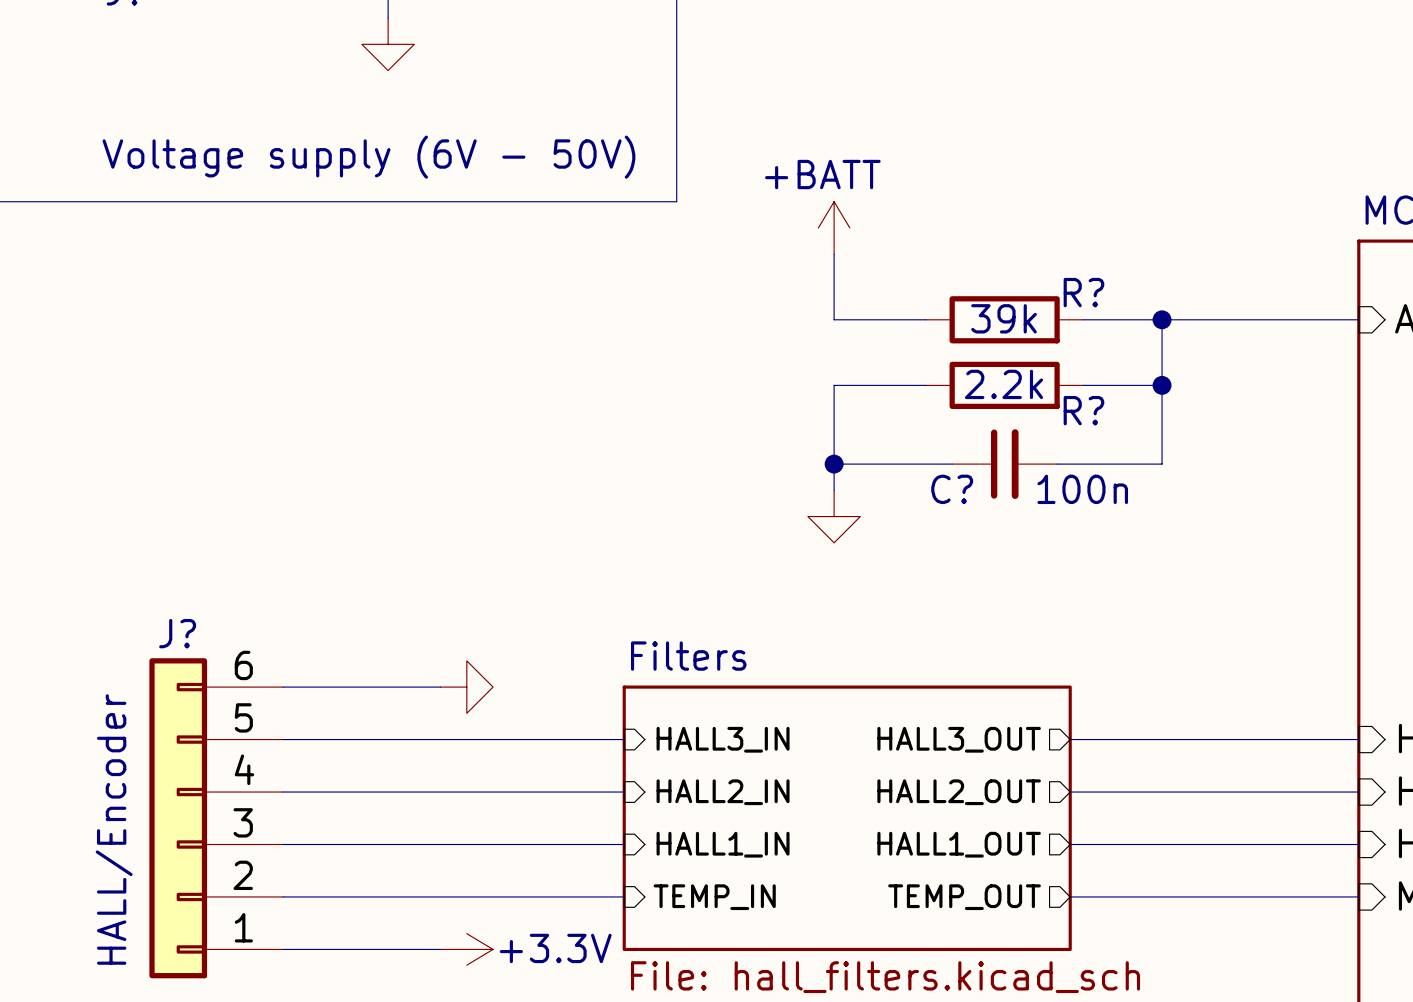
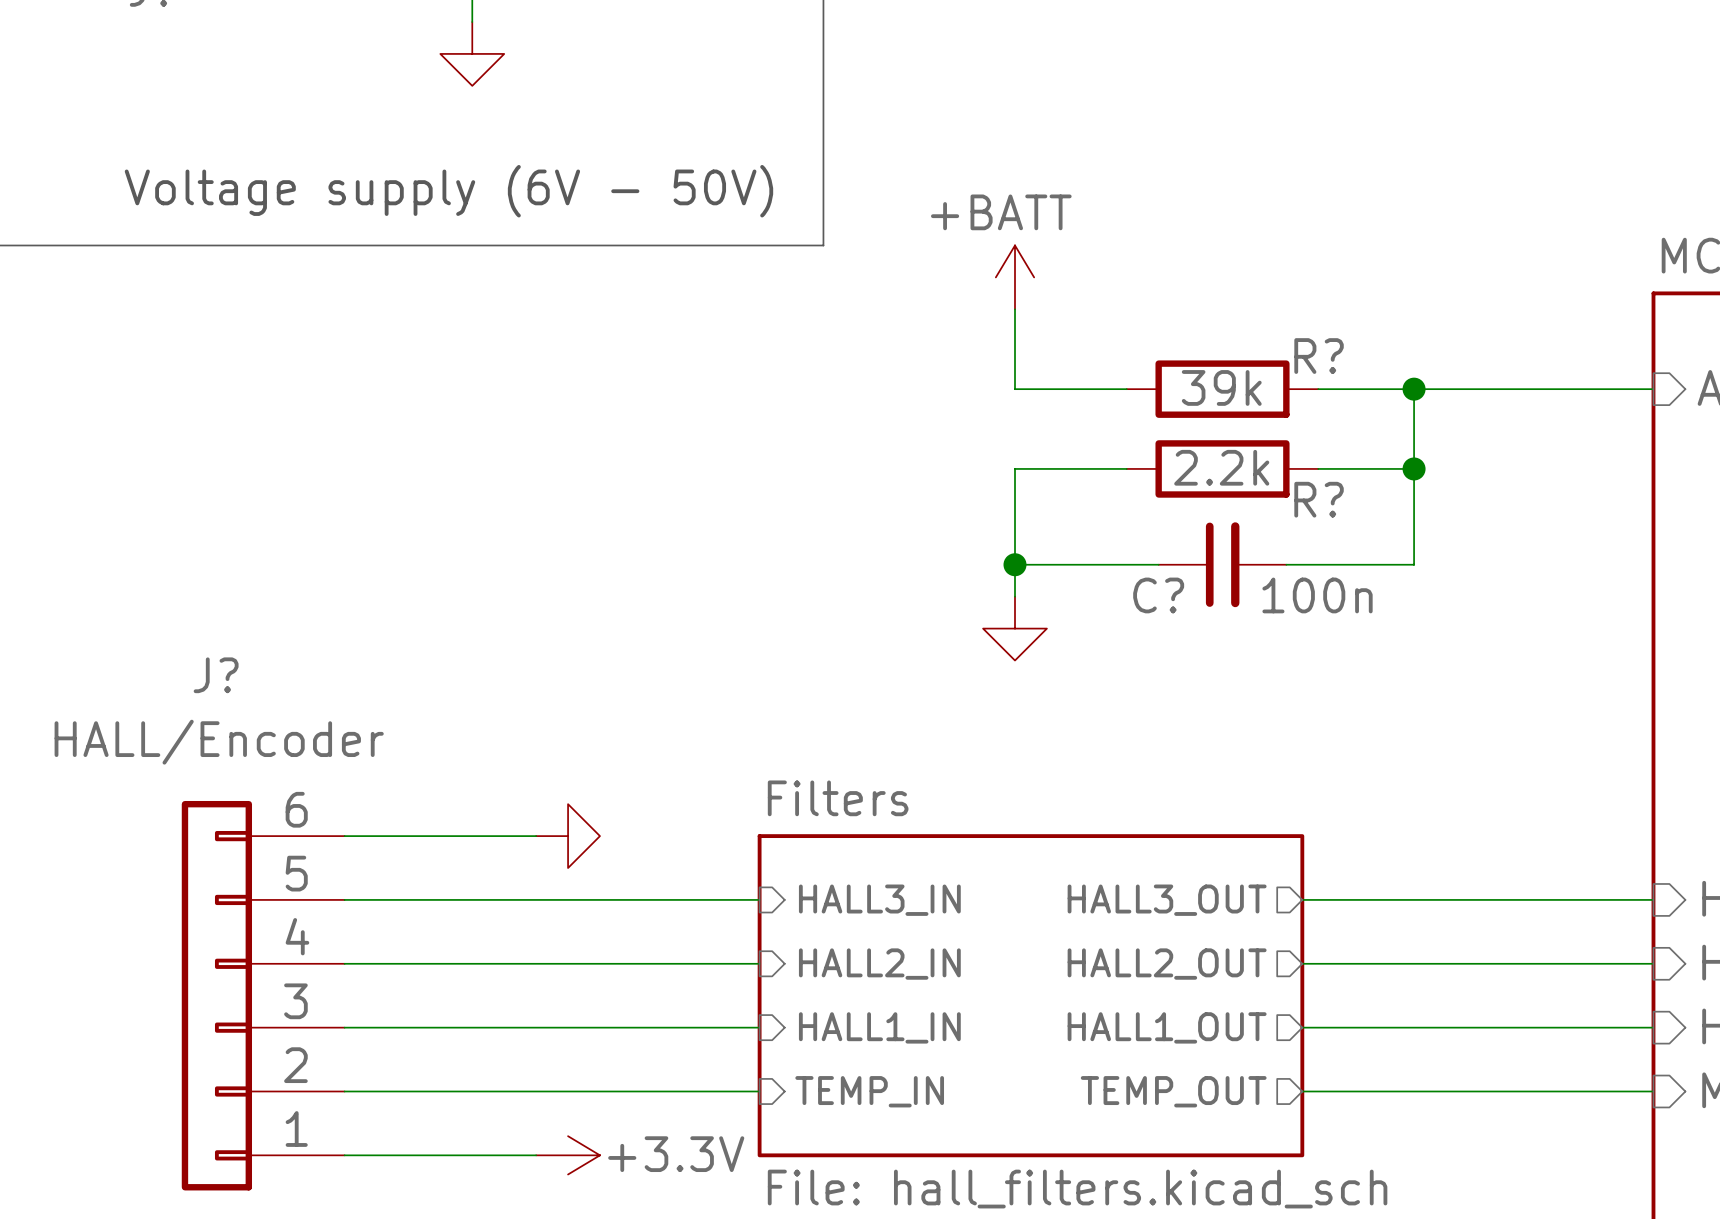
J? name position: J? (177, 633) -> J? (216, 675)
J? value rotation: 0° (114, 829) -> 90° clockwise (219, 742)

